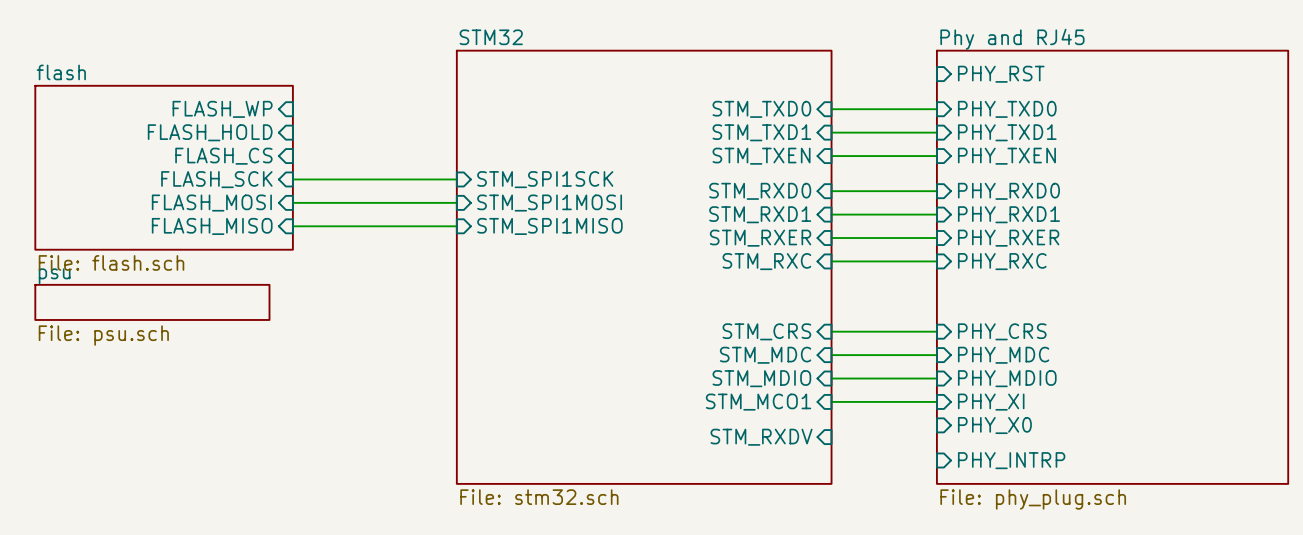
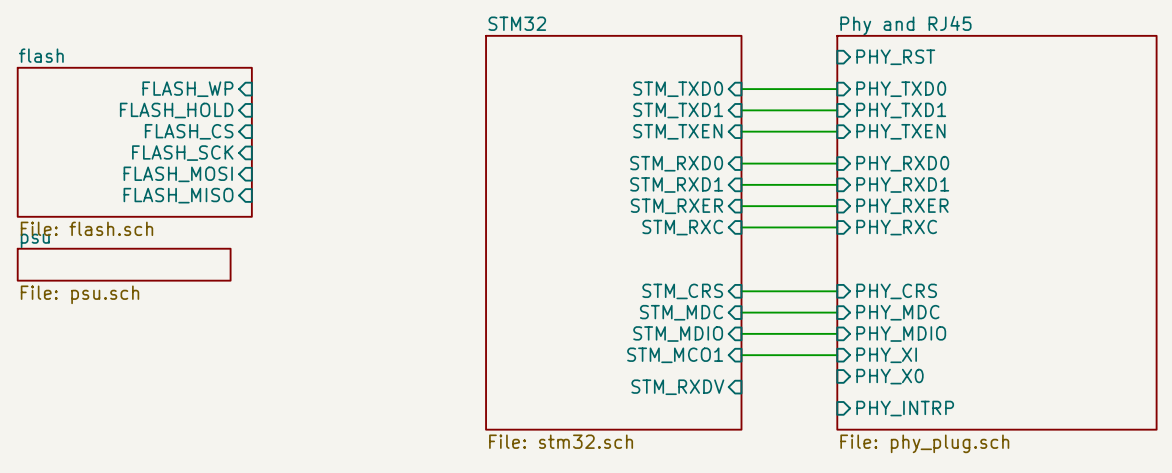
sheet STM32 name position: STM32 (491, 37) -> STM32 (517, 23)
sheet STM32 shape: [456, 50, 832, 484] -> [486, 35, 742, 430]
wire: (292, 179) (456, 179) -> none
sheet pin: STM_SPI1SCK (545, 179) -> none
wire: (292, 202) (456, 202) -> none
sheet pin: STM_SPI1MOSI (549, 203) -> none
wire: (292, 226) (456, 226) -> none
sheet pin: STM_SPI1MISO (549, 226) -> none
sheet STM32 value position: File: stm32.sch (539, 497) -> File: stm32.sch (561, 441)

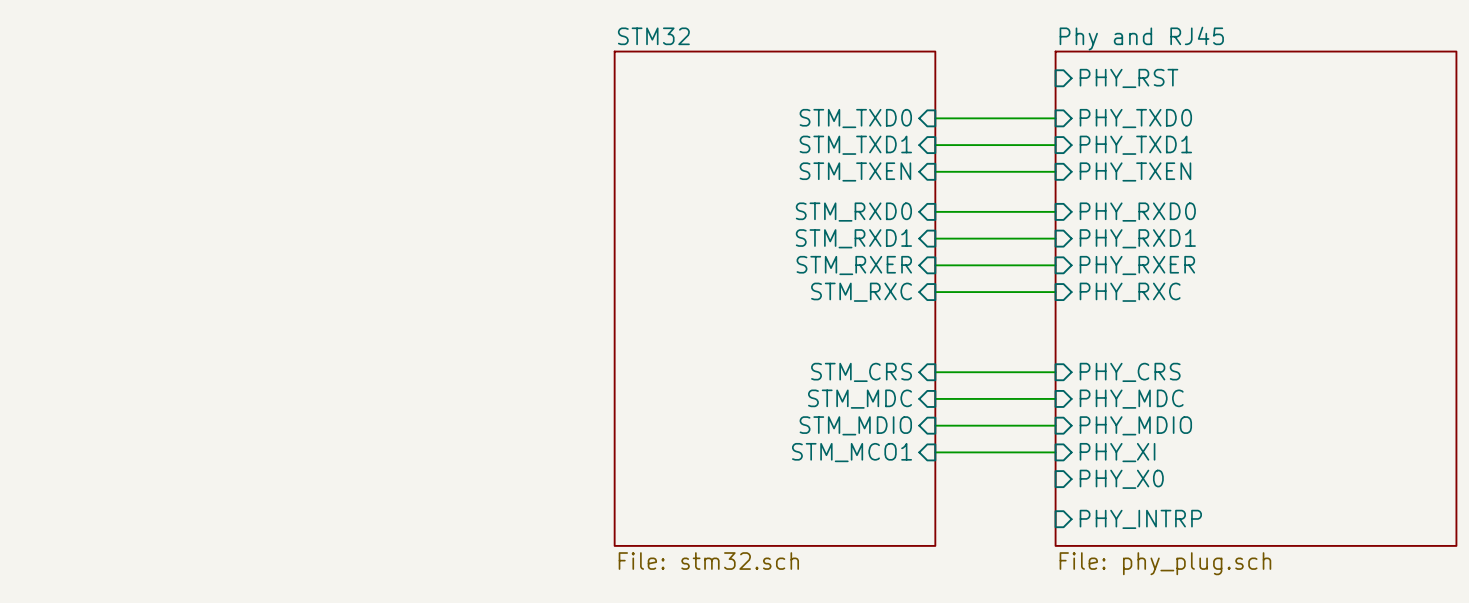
sheet pin: FLASH_WP (187, 89) -> none
sheet pin: FLASH_HOLD (176, 110) -> none
sheet pin: FLASH_CS (189, 131) -> none
sheet flash: File: flash.sch (134, 142) -> none
sheet pin: FLASH_SCK (182, 153) -> none
sheet pin: FLASH_MOSI (178, 174) -> none
sheet pin: FLASH_MISO (178, 195) -> none
sheet psu: File: psu.sch (124, 264) -> none
sheet pin: STM_RXDV (677, 387) -> none

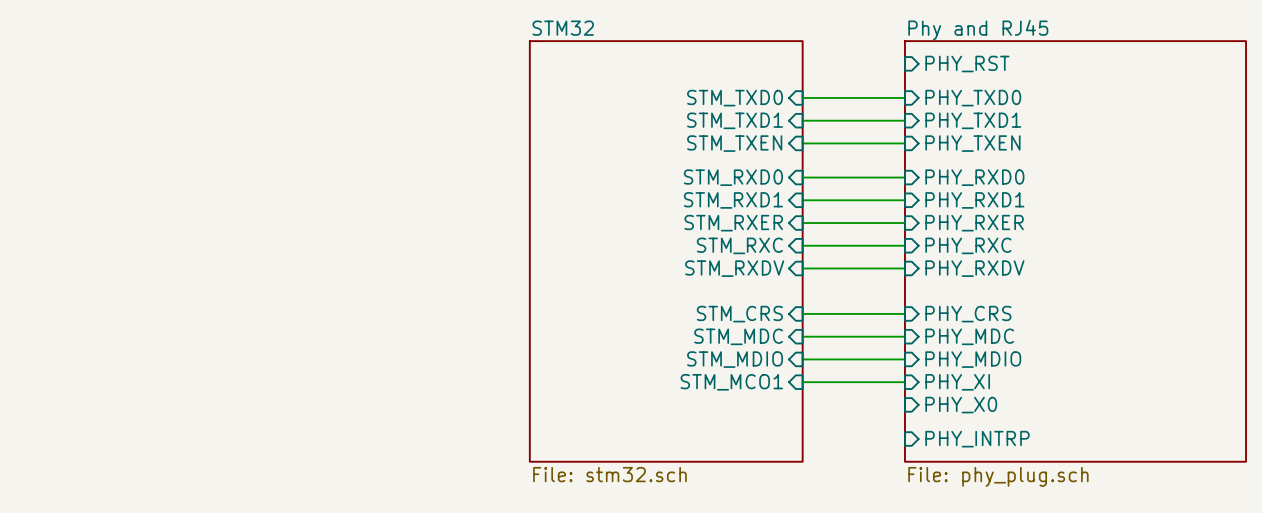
sheet pin: none -> STM_RXDV (734, 268)
wire: none -> (802, 268) (904, 268)
sheet pin: none -> PHY_RXDV (974, 268)

